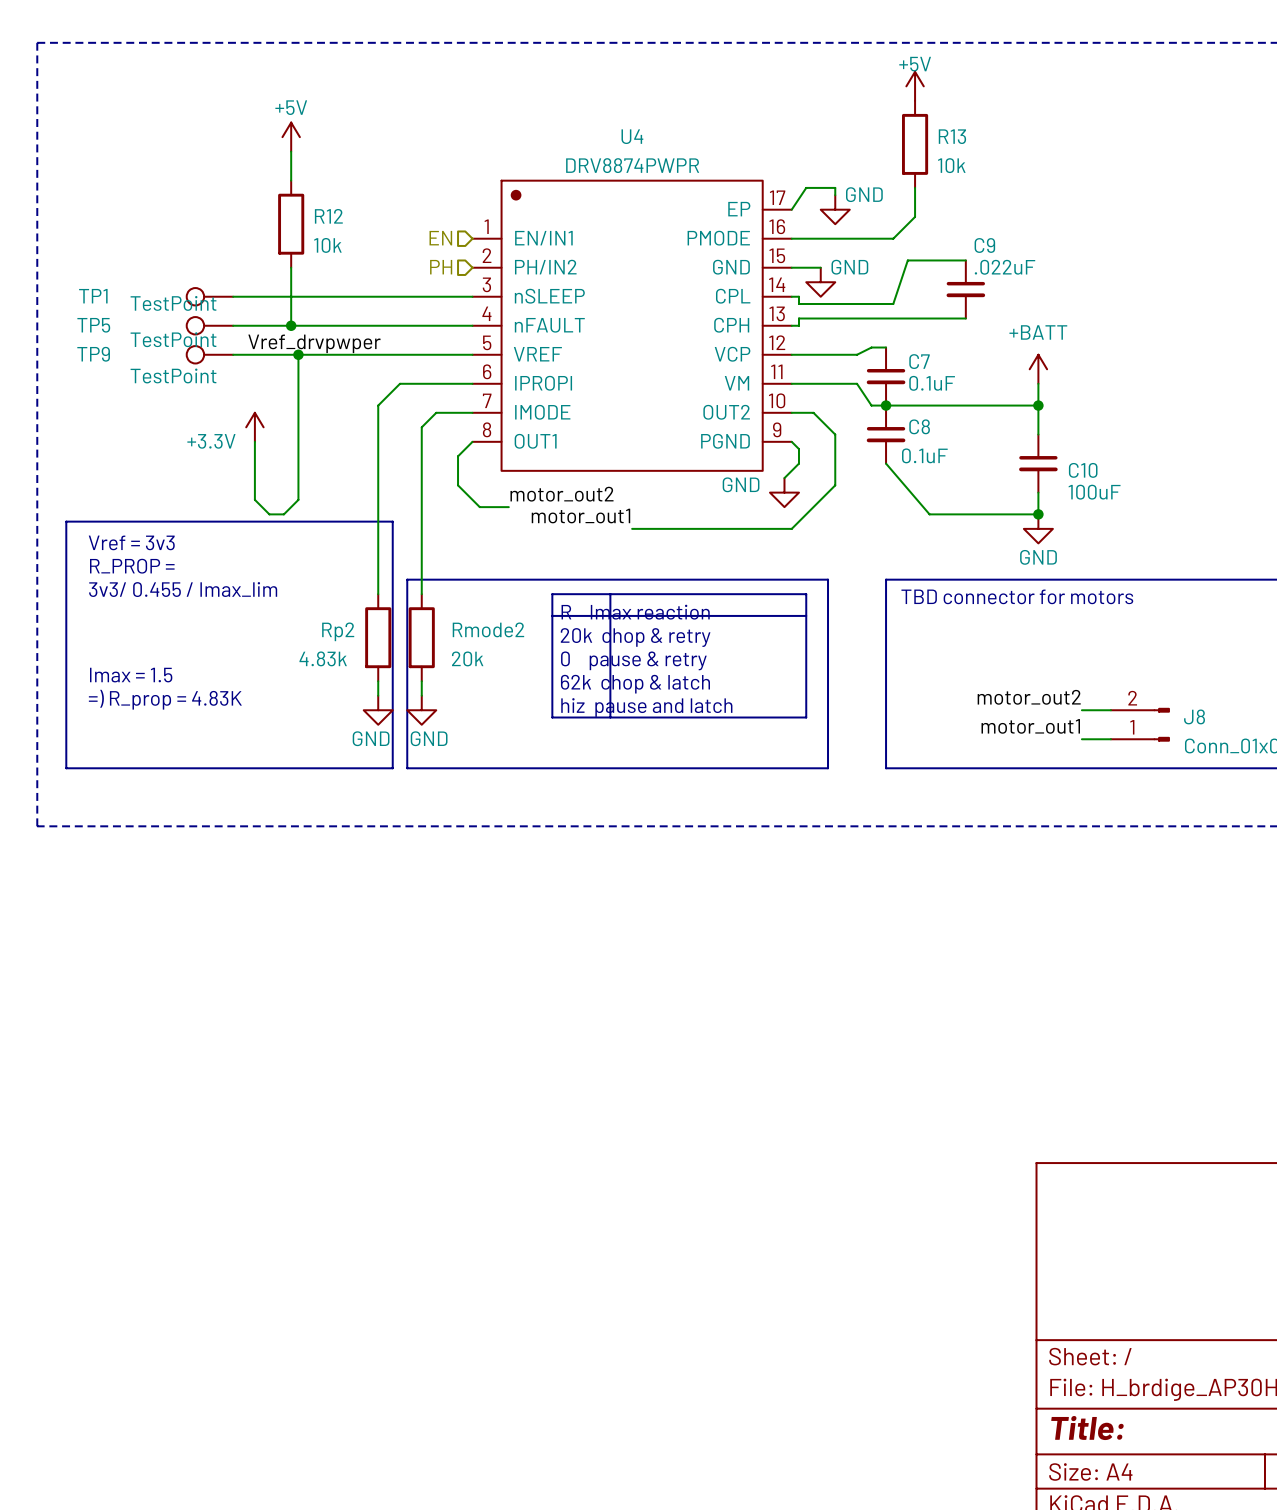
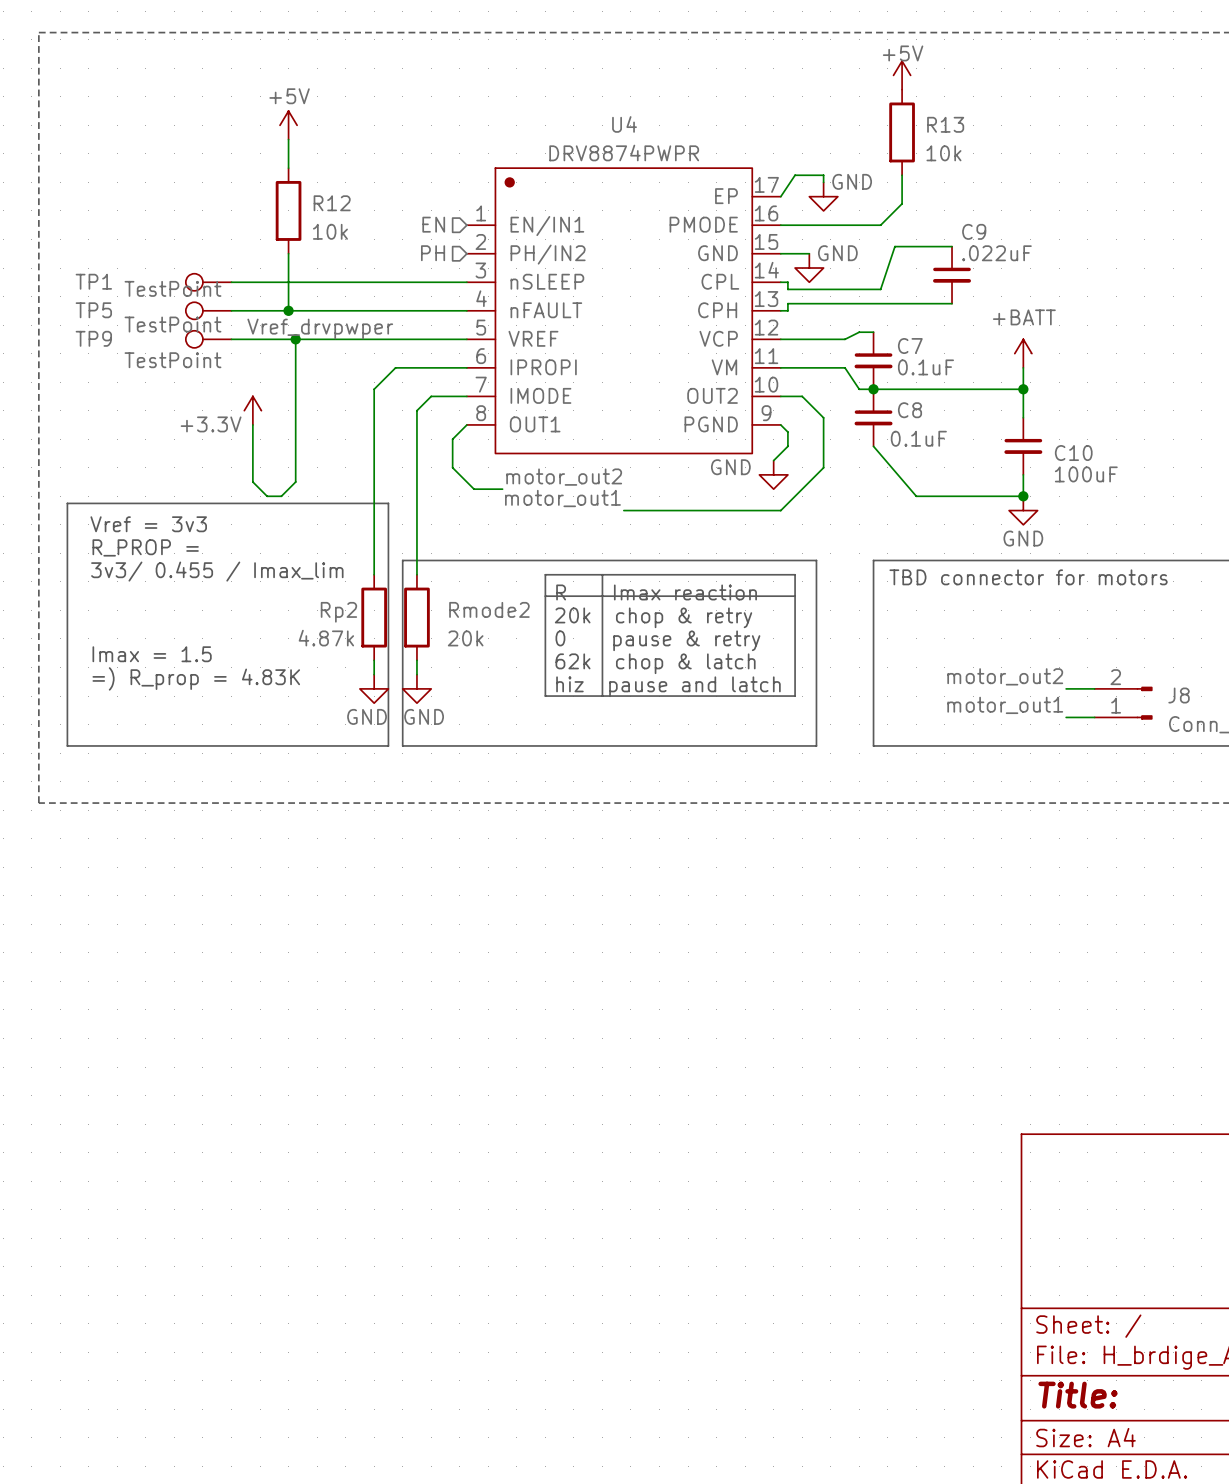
Rp2 value: 4.83k (323, 658) -> 4.87k (326, 638)

